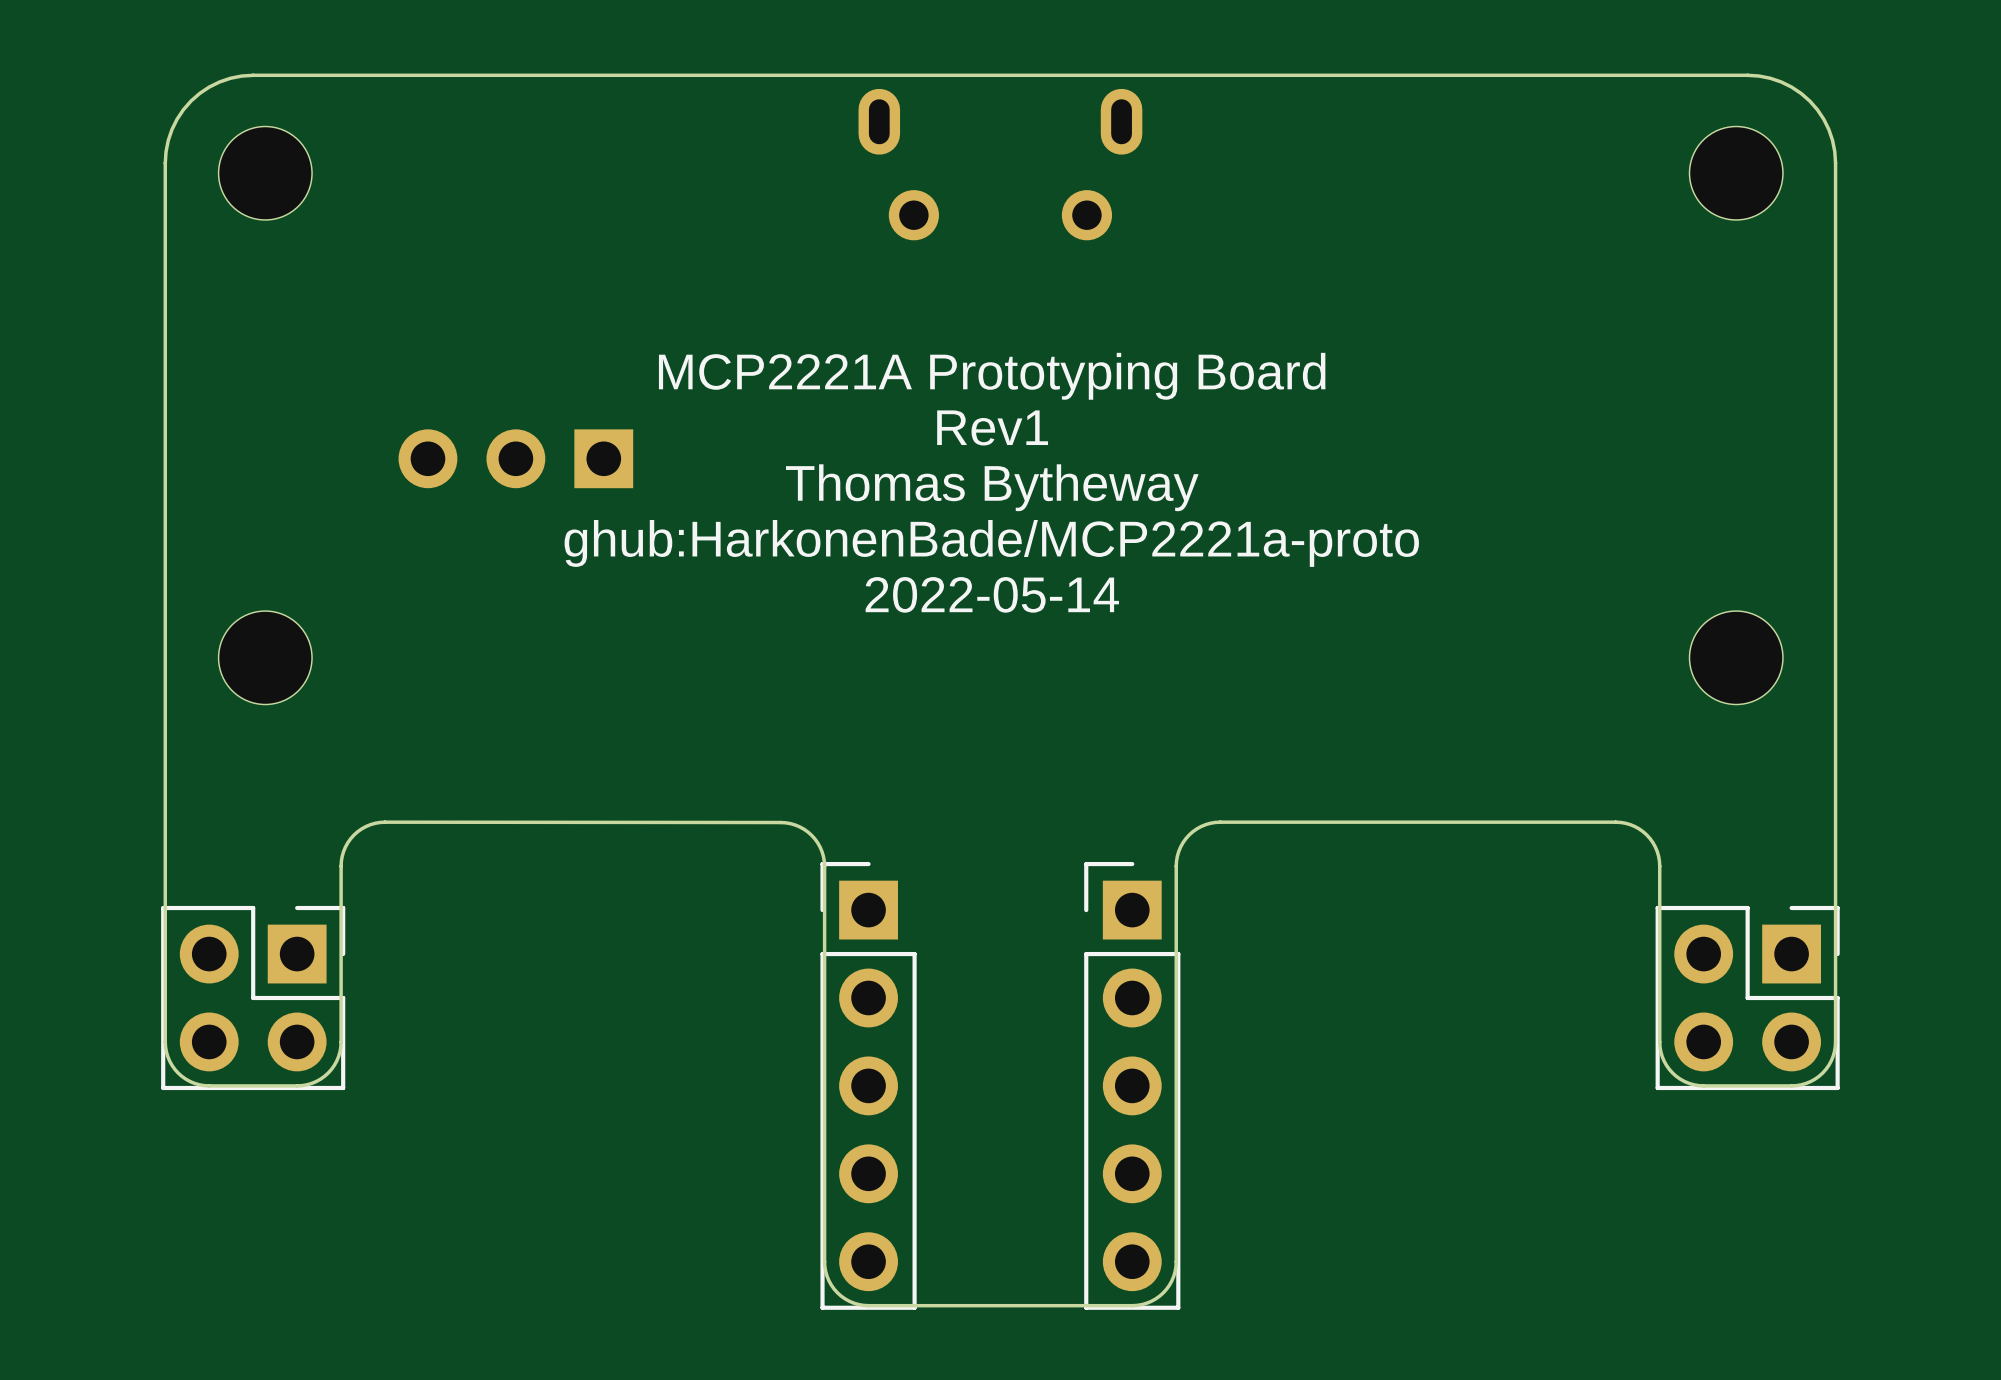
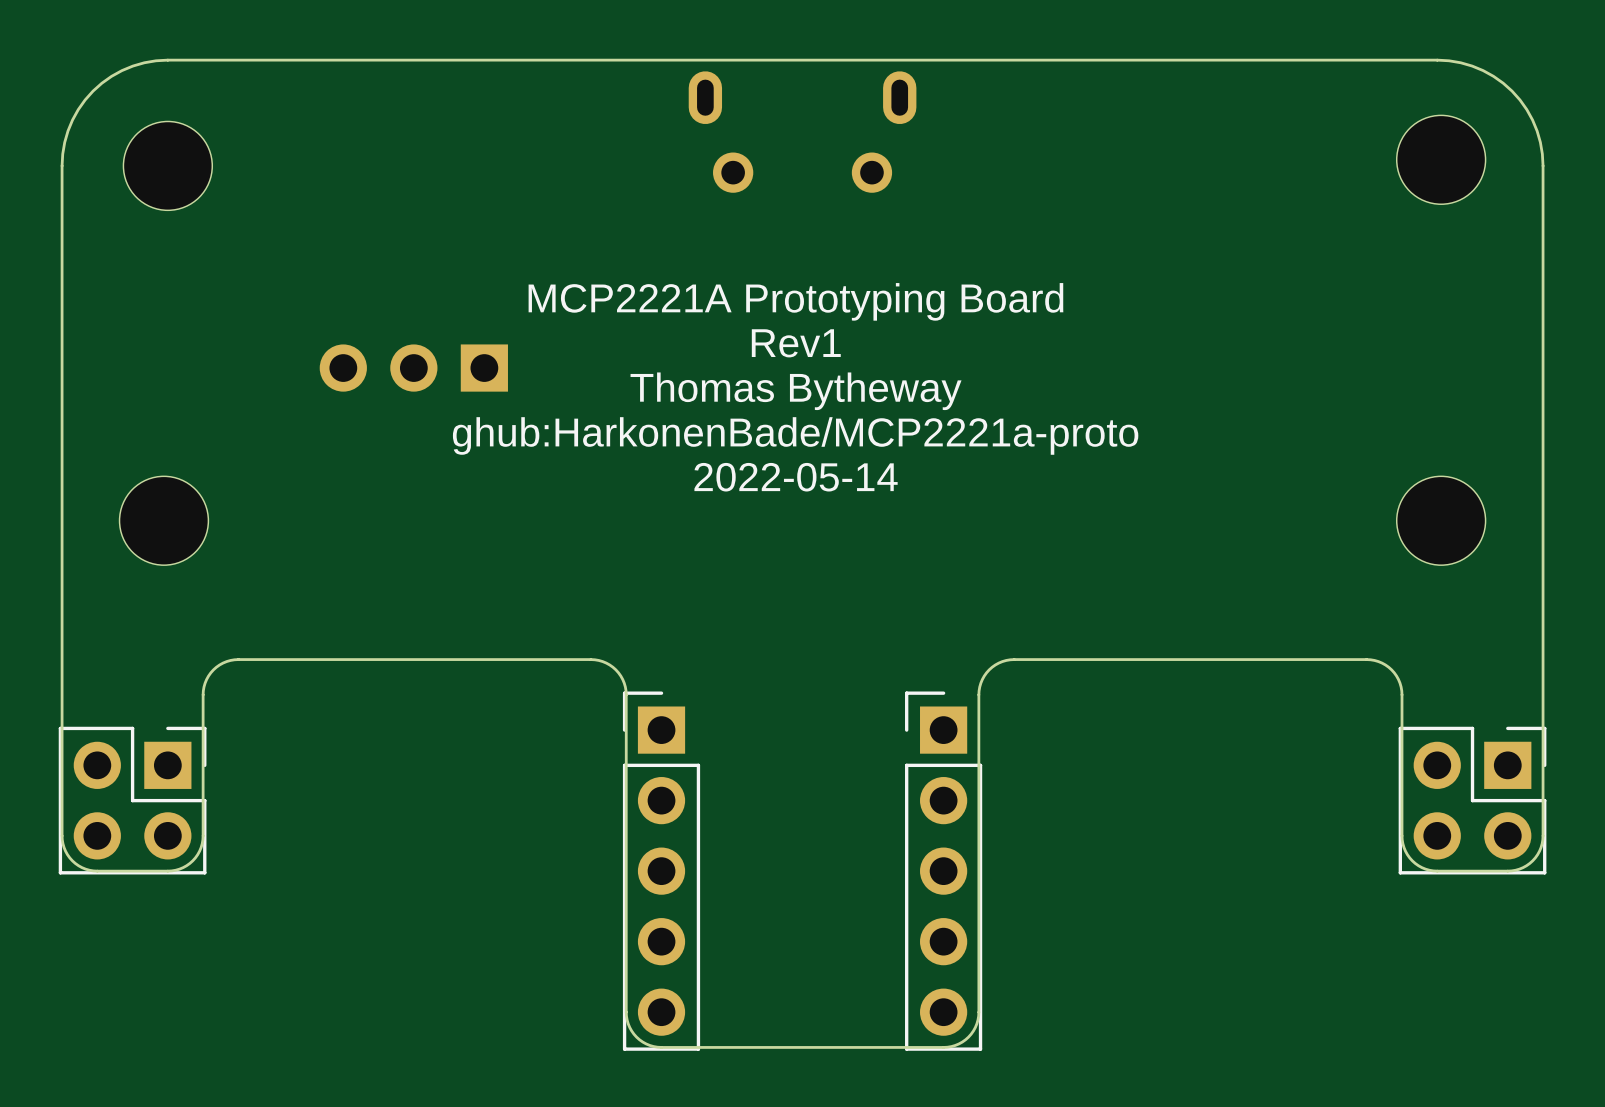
part: (265, 173) -> none
part: (1736, 173) -> none
part: none -> (1441, 159)
part: none -> (167, 165)
part: none -> (163, 520)
part: none -> (1441, 520)
part: (265, 657) -> none
part: (1736, 657) -> none
board edge: (1264, 822) (1220, 822) (1205, 824) (1189, 835) (1182, 842) (1177, 856) (1175, 1266) (1171, 1280) (1163, 1292) (1146, 1303) (1132, 1305) -> (1014, 659) (1002, 661) (992, 667) (984, 676) (979, 690) (977, 1020) (971, 1034) (955, 1045) (908, 1047)
board edge: (1615, 822) (1630, 824) (1643, 831) (1653, 842) (1658, 856) (1659, 1041) (1662, 1056) (1669, 1069) (1684, 1081) (1703, 1085) (1796, 1085) (1806, 1083) (1819, 1076) (1831, 1061) (1835, 1041) (1835, 163) (1832, 140) (1823, 119) (1809, 101) (1791, 87) (1770, 78) (1747, 75) (253, 75) (230, 78) (209, 87) (191, 101) (177, 119) (168, 140) (165, 163) (165, 1041) (169, 1061) (174, 1069) (185, 1079) (199, 1084) (209, 1085) (302, 1085) (320, 1079) (331, 1069) (338, 1056) (341, 1041) (341, 861) (343, 851) (350, 838) (361, 828) (370, 824) (385, 822) (780, 822) (795, 824) (804, 829) (815, 839) (822, 851) (824, 861) (824, 1266) (828, 1280) (837, 1292) (854, 1303) (868, 1305) -> (1296, 659) (1370, 659) (1385, 664) (1396, 676) (1402, 694) (1402, 839) (1407, 854) (1415, 863) (1433, 870) (1507, 871) (1523, 867) (1535, 857) (1541, 847) (1543, 835) (1542, 154) (1537, 130) (1519, 99) (1503, 83) (1483, 70) (1460, 62) (1437, 60) (167, 60) (132, 66) (111, 76) (93, 91) (78, 109) (68, 130) (62, 154) (62, 835) (67, 854) (78, 865) (97, 871) (171, 870) (186, 865) (195, 857) (201, 847) (203, 835) (203, 690) (210, 672) (226, 661) (238, 659) (590, 659) (602, 661) (618, 672) (626, 690) (627, 1020) (633, 1034) (649, 1045) (696, 1047)
part position: (253, 997) -> (132, 800)
part position: (1747, 997) -> (1472, 800)
part position: (868, 1085) -> (661, 871)
part position: (1132, 1085) -> (943, 871)

